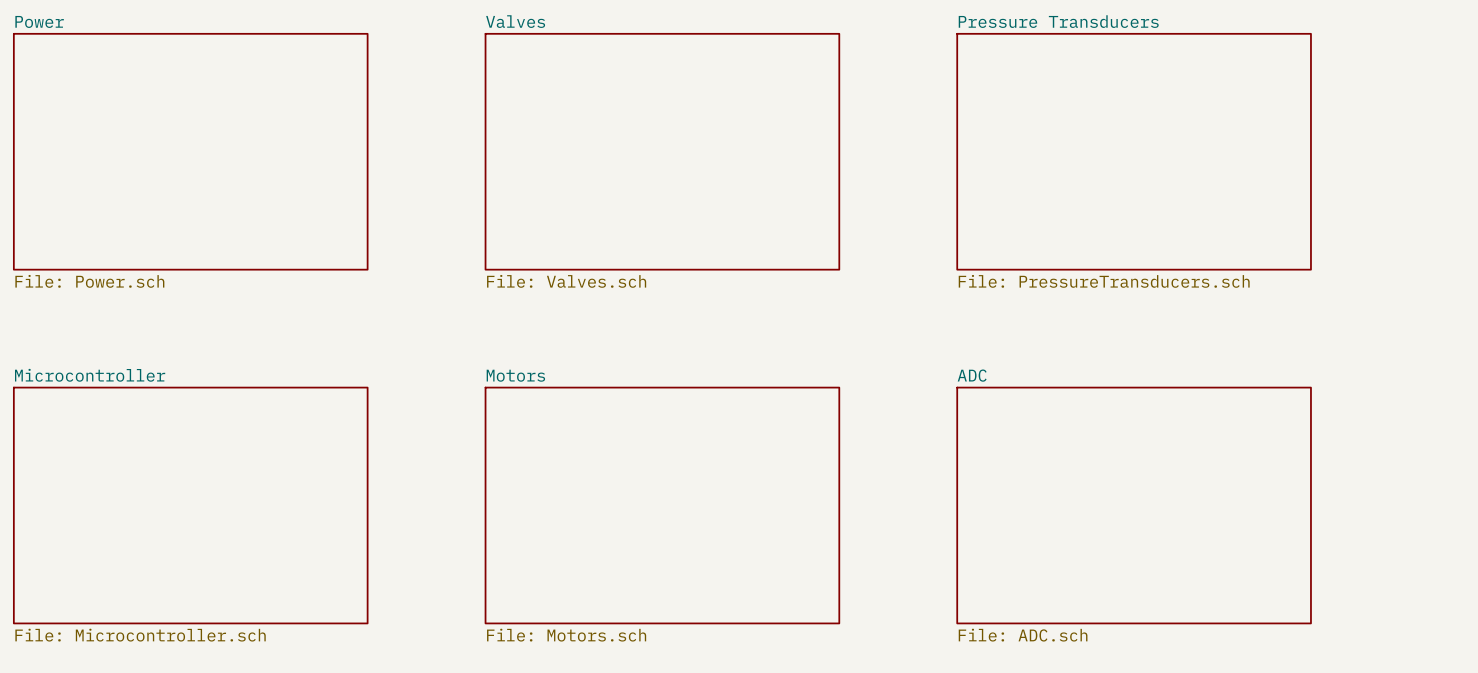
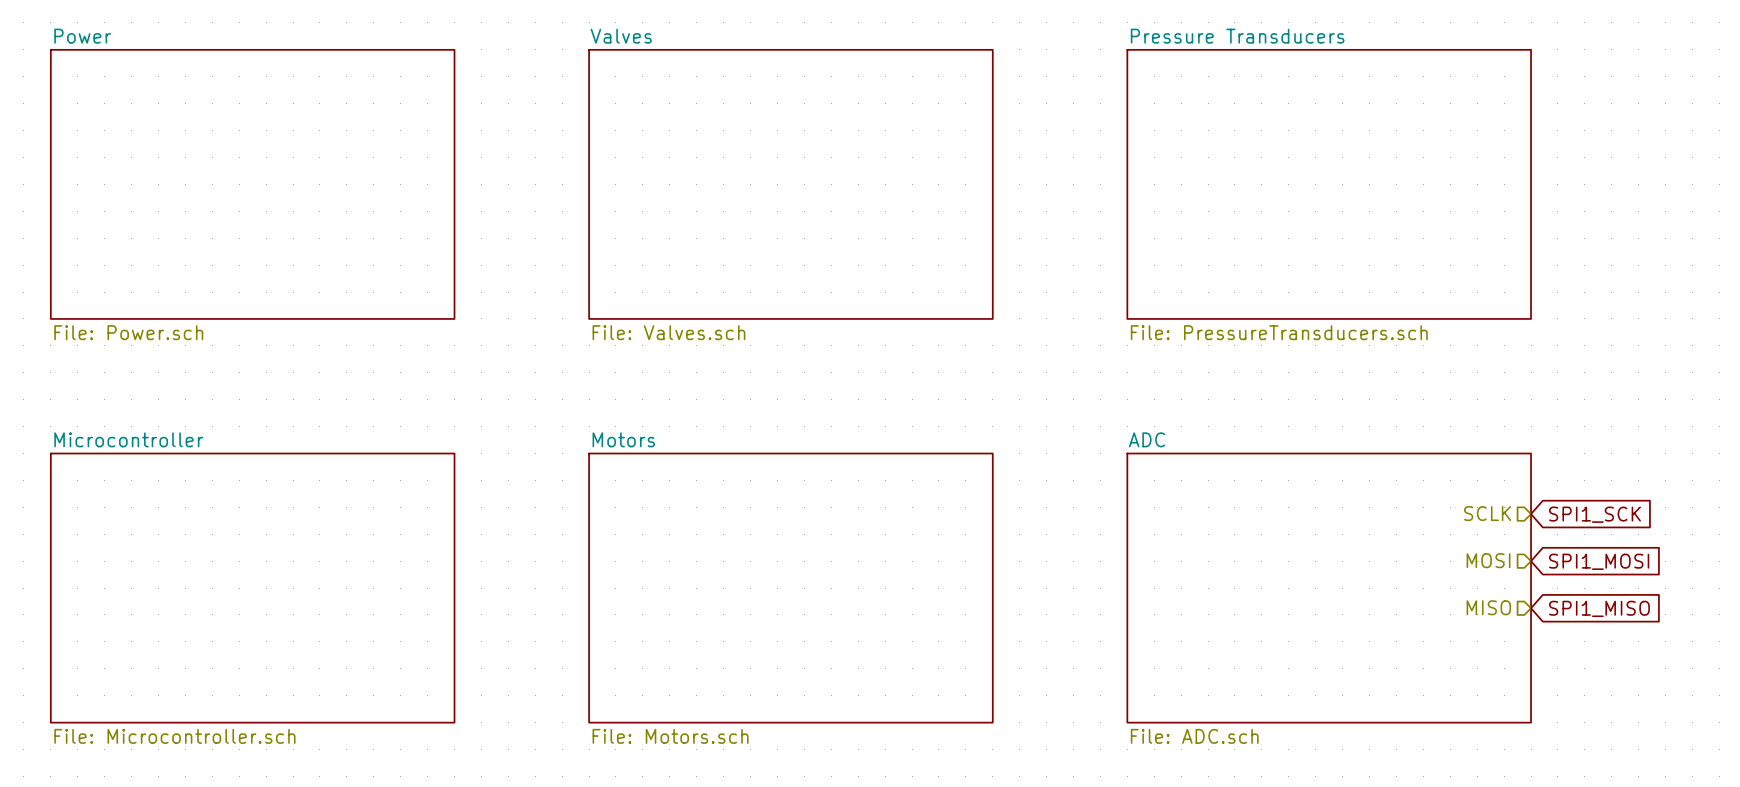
hierarchical label: none -> SCLK (1487, 513)
global label: none -> SPI1_SCK (1594, 514)
hierarchical label: none -> MOSI (1488, 560)
global label: none -> SPI1_MOSI (1599, 561)
hierarchical label: none -> MISO (1488, 607)
global label: none -> SPI1_MISO (1599, 608)

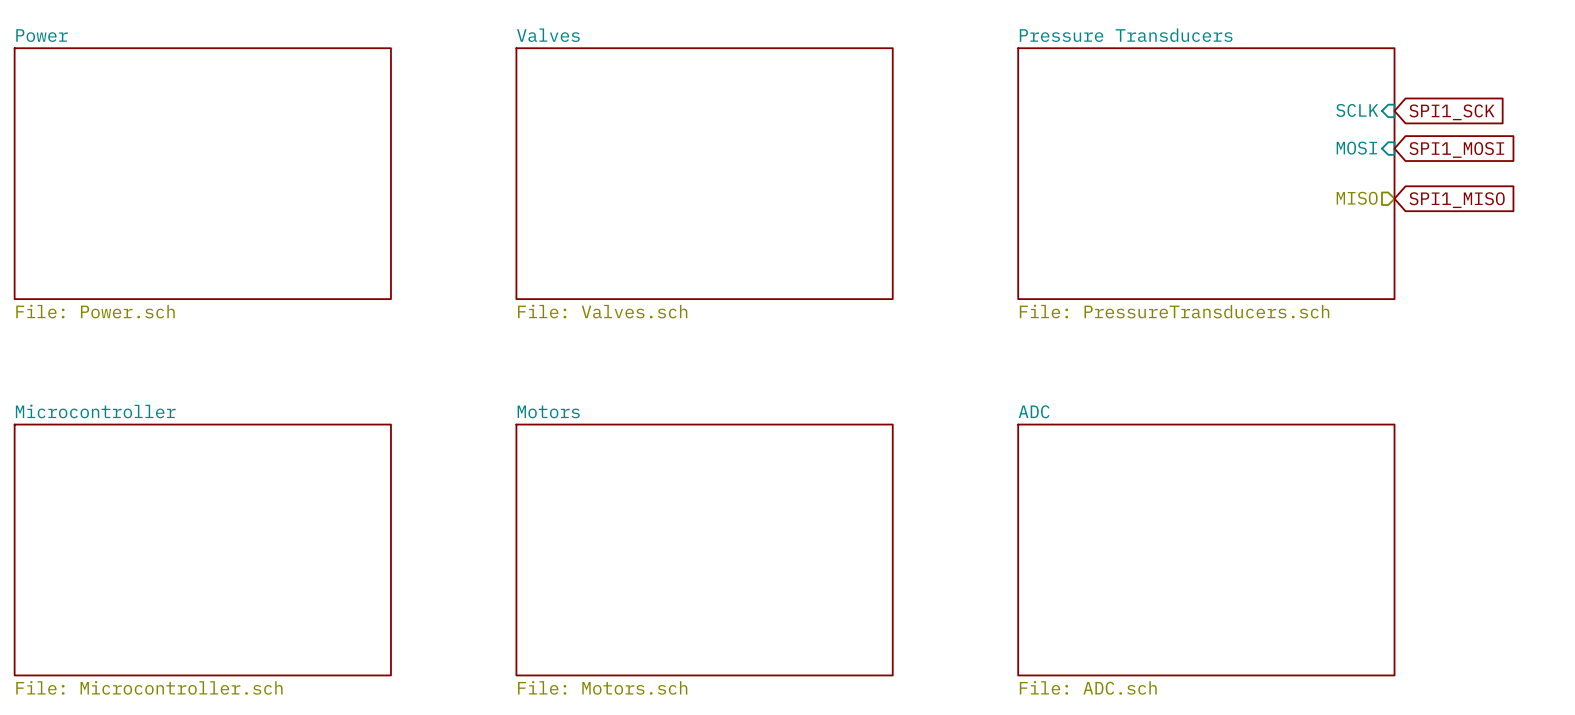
sheet pin: none -> SCLK (1357, 110)
global label: none -> SPI1_SCK (1451, 112)
sheet pin: none -> MOSI (1356, 148)
global label: none -> SPI1_MOSI (1456, 149)
hierarchical label: none -> MISO (1357, 198)
global label: none -> SPI1_MISO (1457, 200)
hierarchical label: SCLK (1487, 513) -> none
global label: SPI1_SCK (1594, 514) -> none
hierarchical label: MOSI (1488, 560) -> none
global label: SPI1_MOSI (1599, 561) -> none
hierarchical label: MISO (1488, 607) -> none
global label: SPI1_MISO (1599, 608) -> none

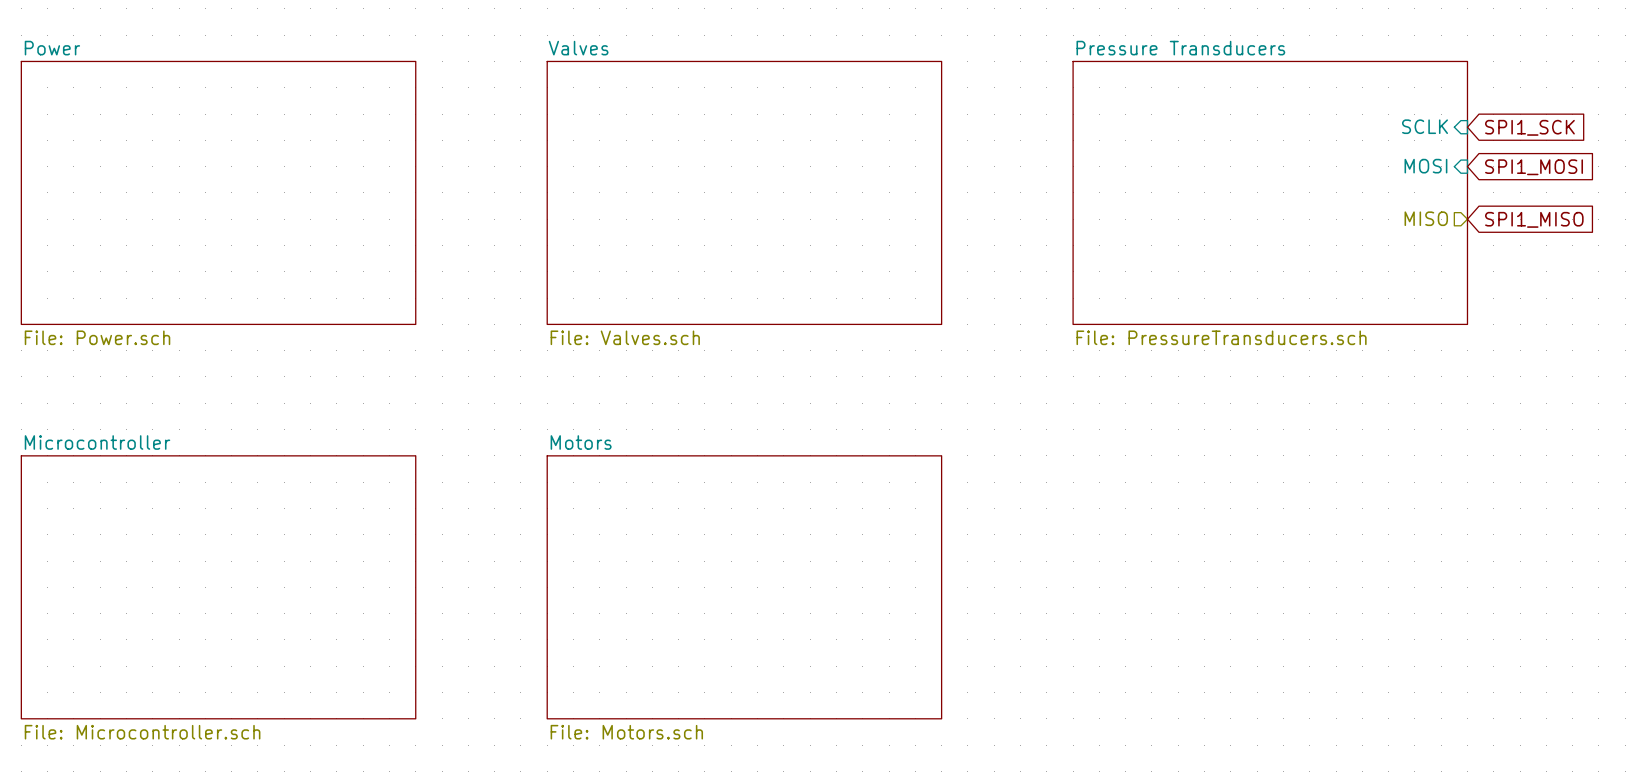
sheet ADC: File: ADC.sch (1206, 549) -> none

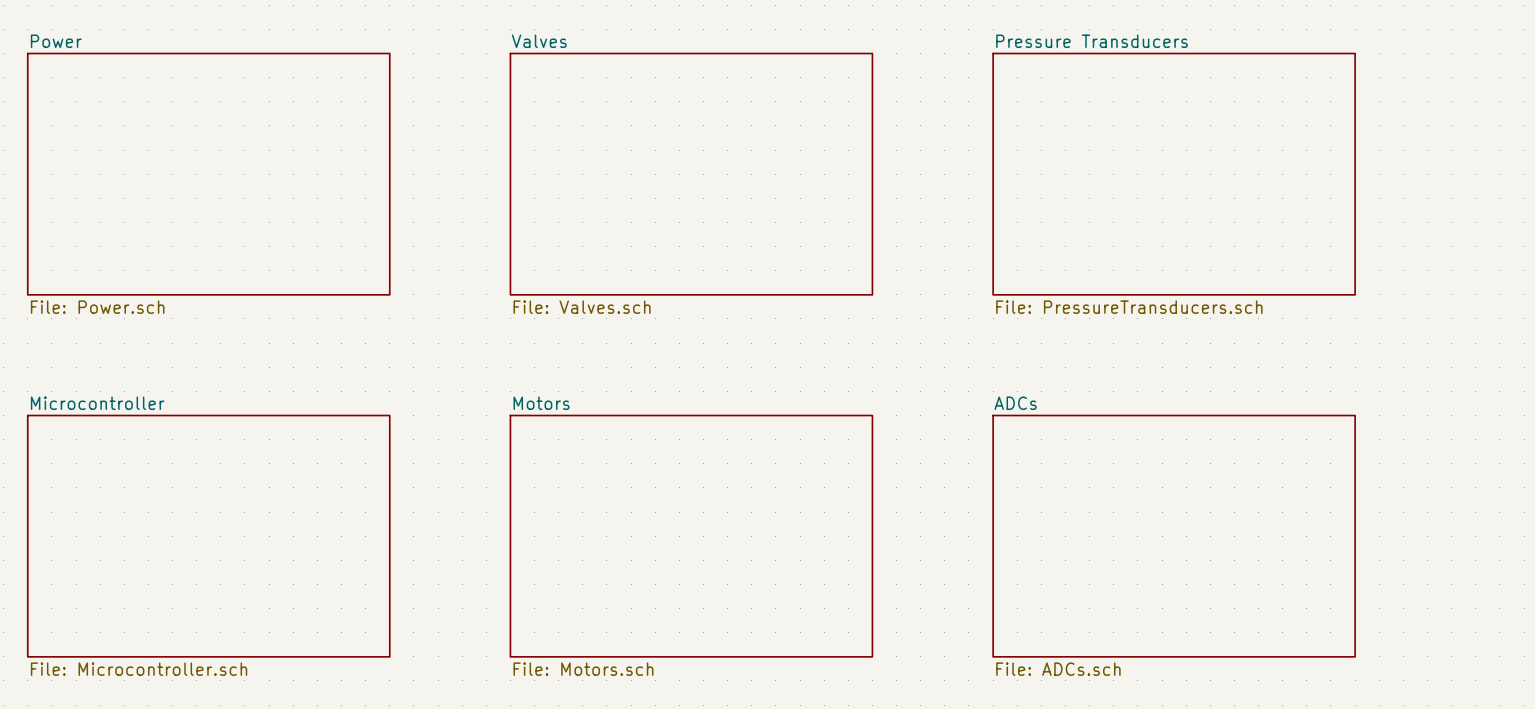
sheet pin: SCLK (1425, 126) -> none
global label: SPI1_SCK (1529, 127) -> none
sheet pin: MOSI (1425, 166) -> none
global label: SPI1_MOSI (1534, 167) -> none
hierarchical label: MISO (1426, 218) -> none
global label: SPI1_MISO (1534, 219) -> none
sheet ADCs: none -> File: ADCs.sch (1174, 536)

